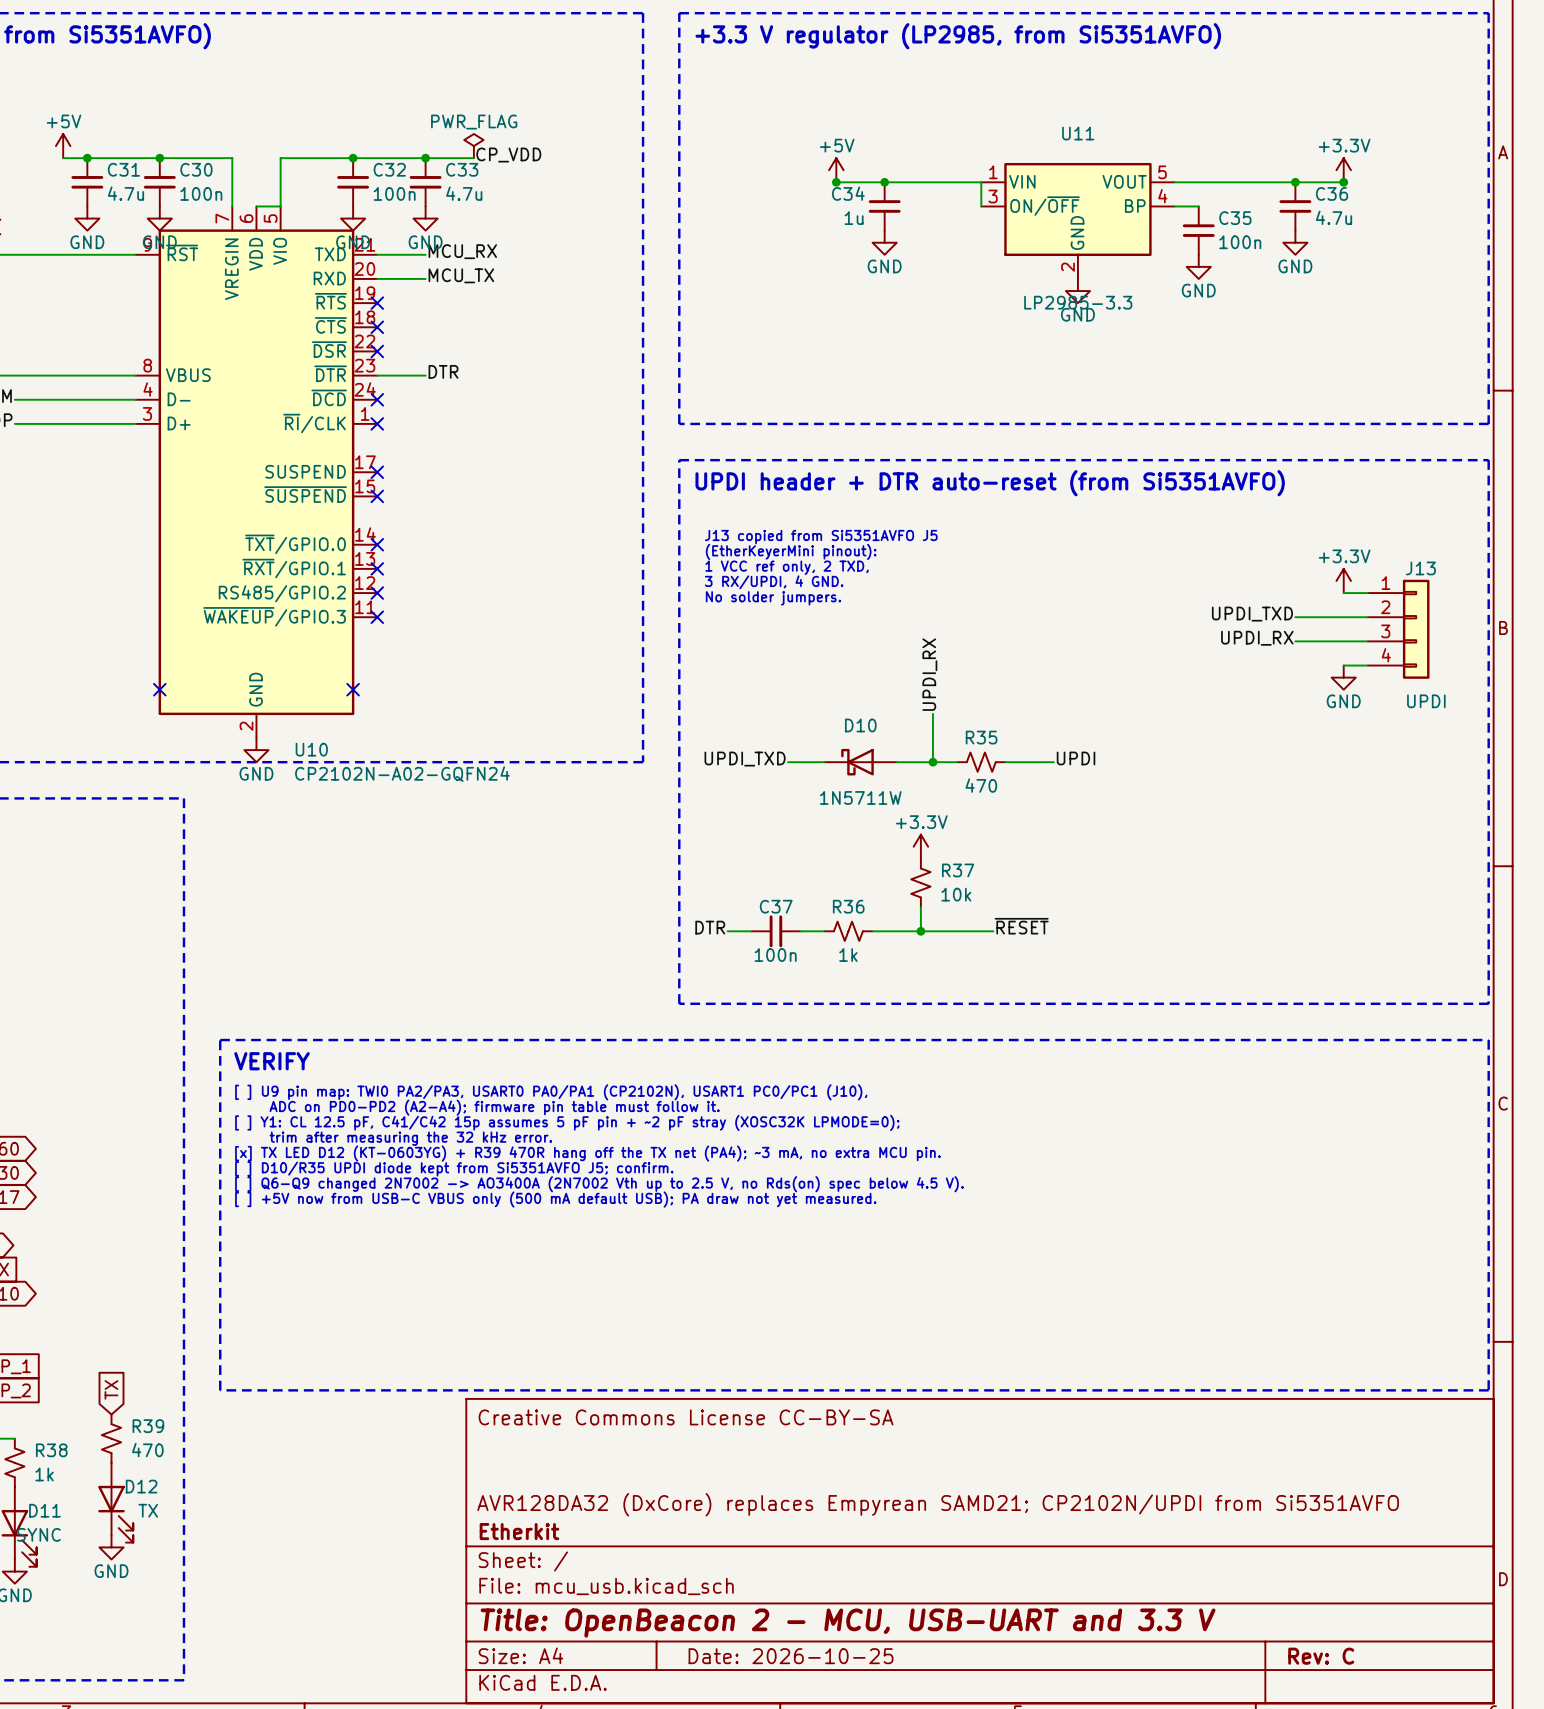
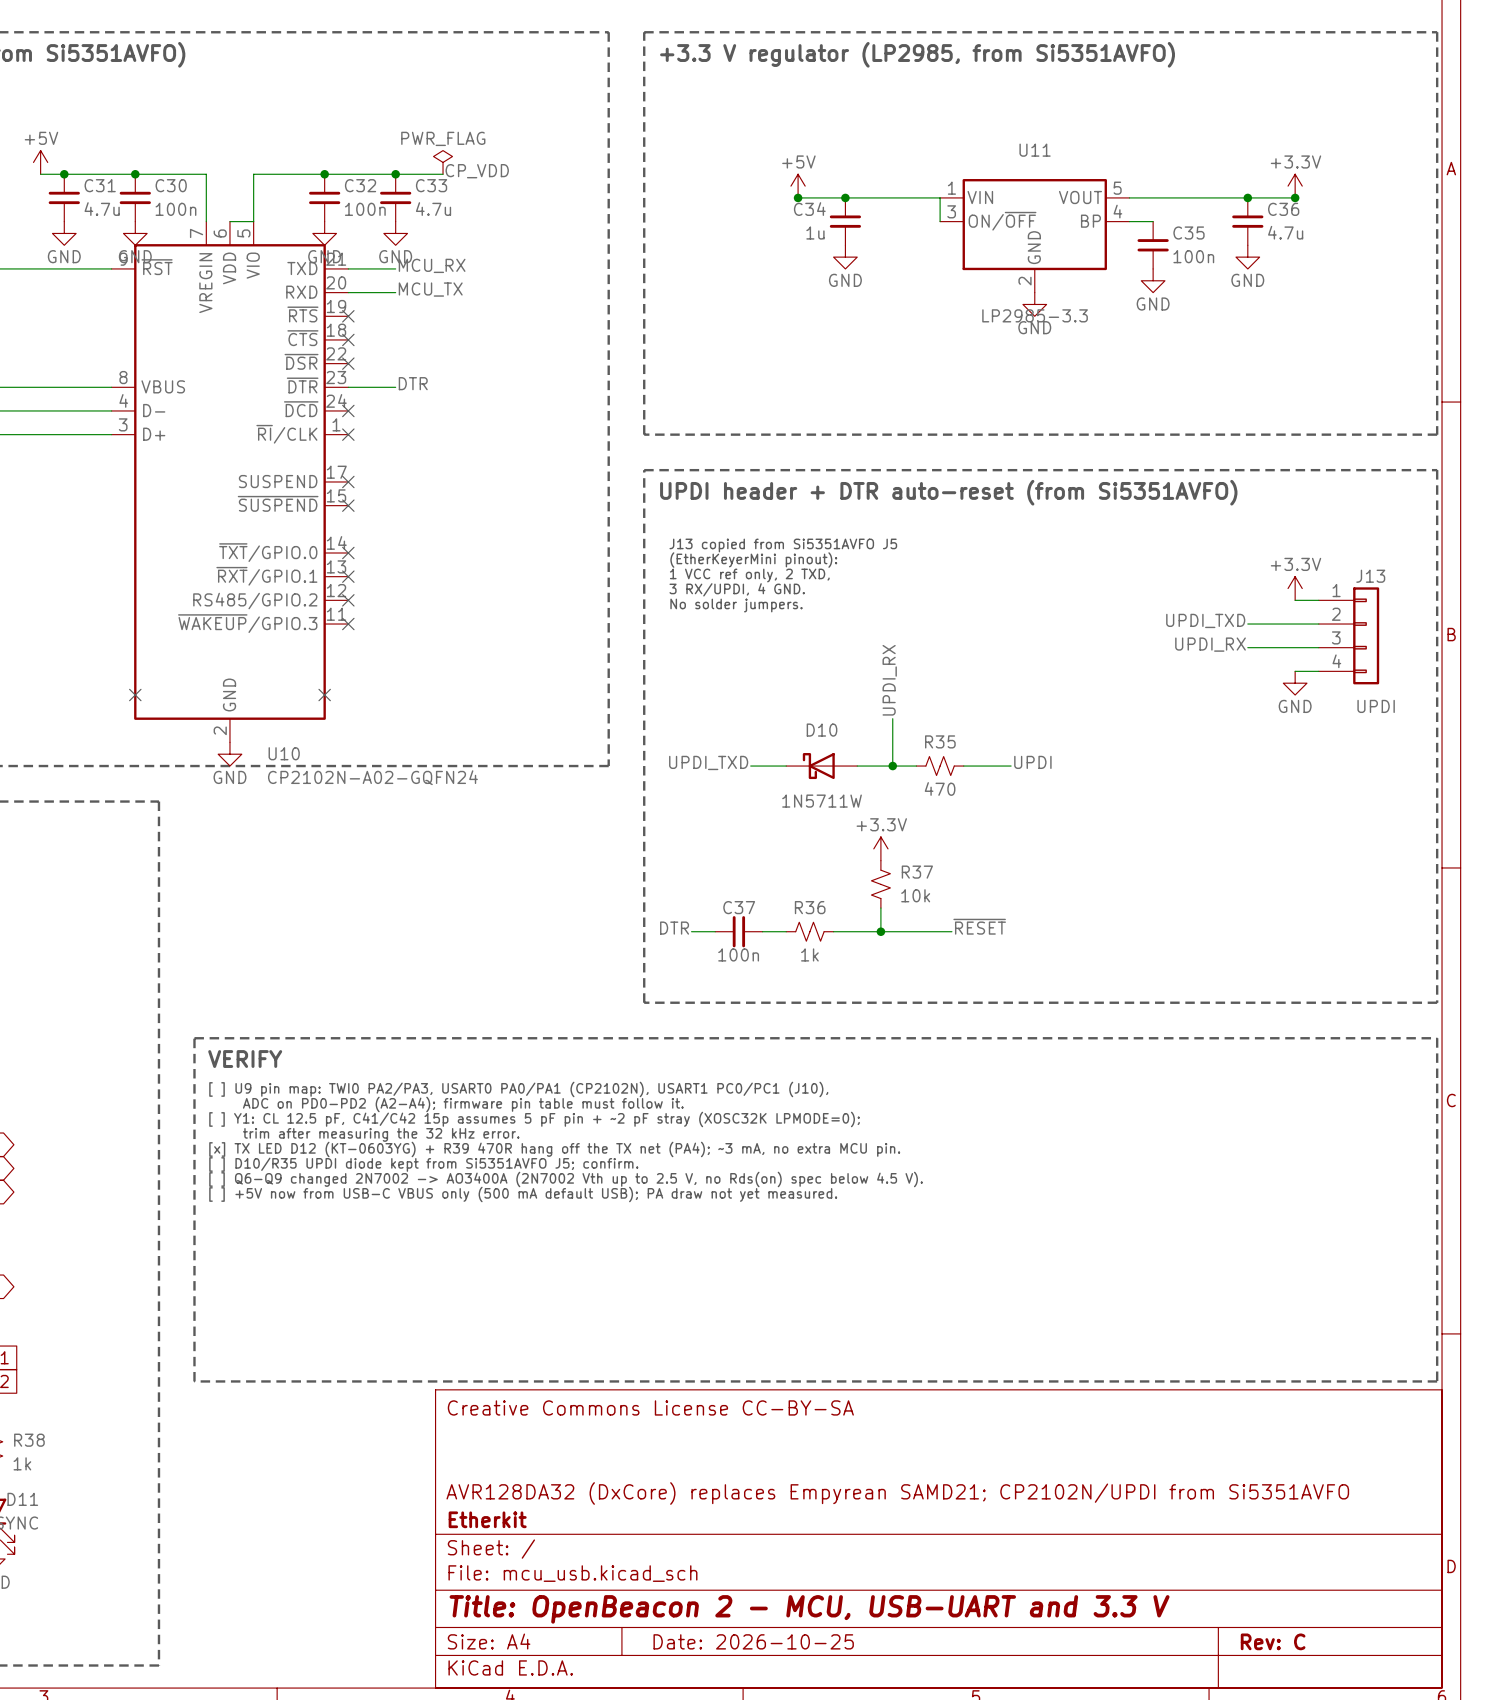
global label: TX (111, 1389) -> none
R39: 470 (111, 1438) -> none
D12: TX (115, 1502) -> none
power symbol: GND (111, 1547) -> none

